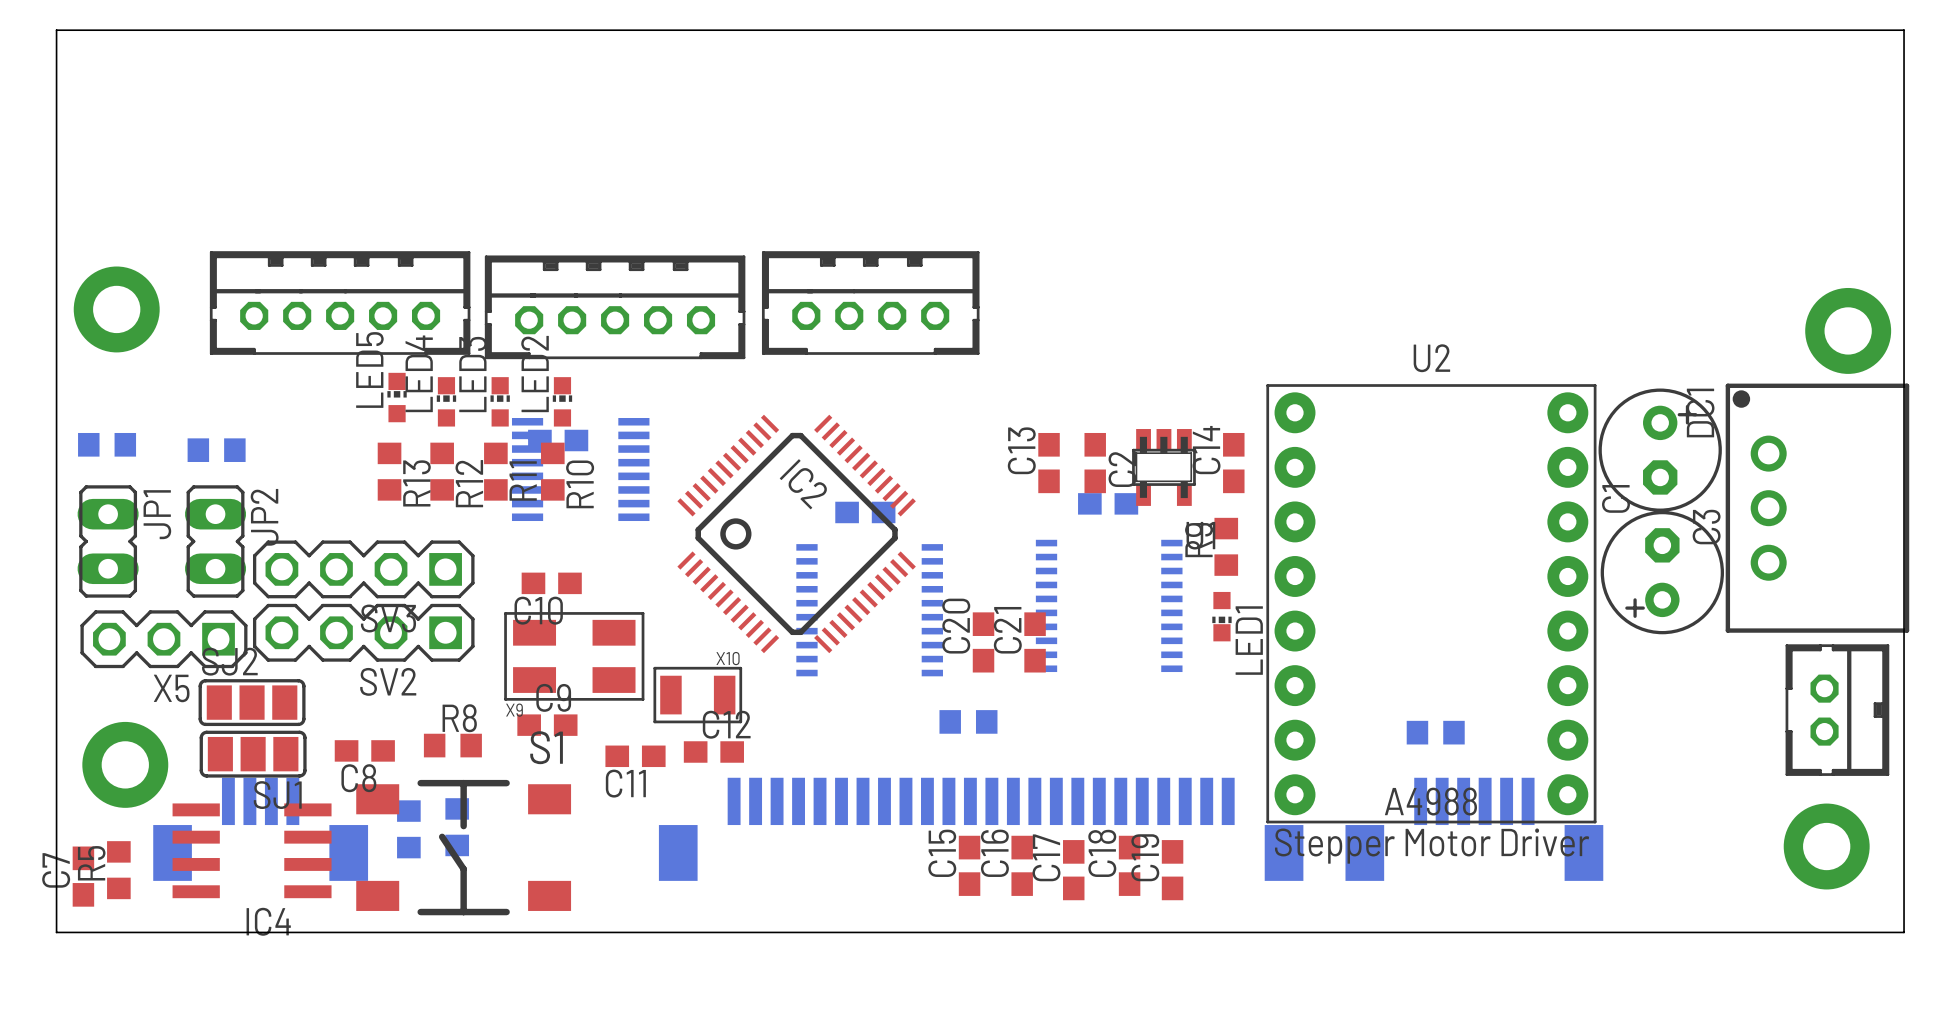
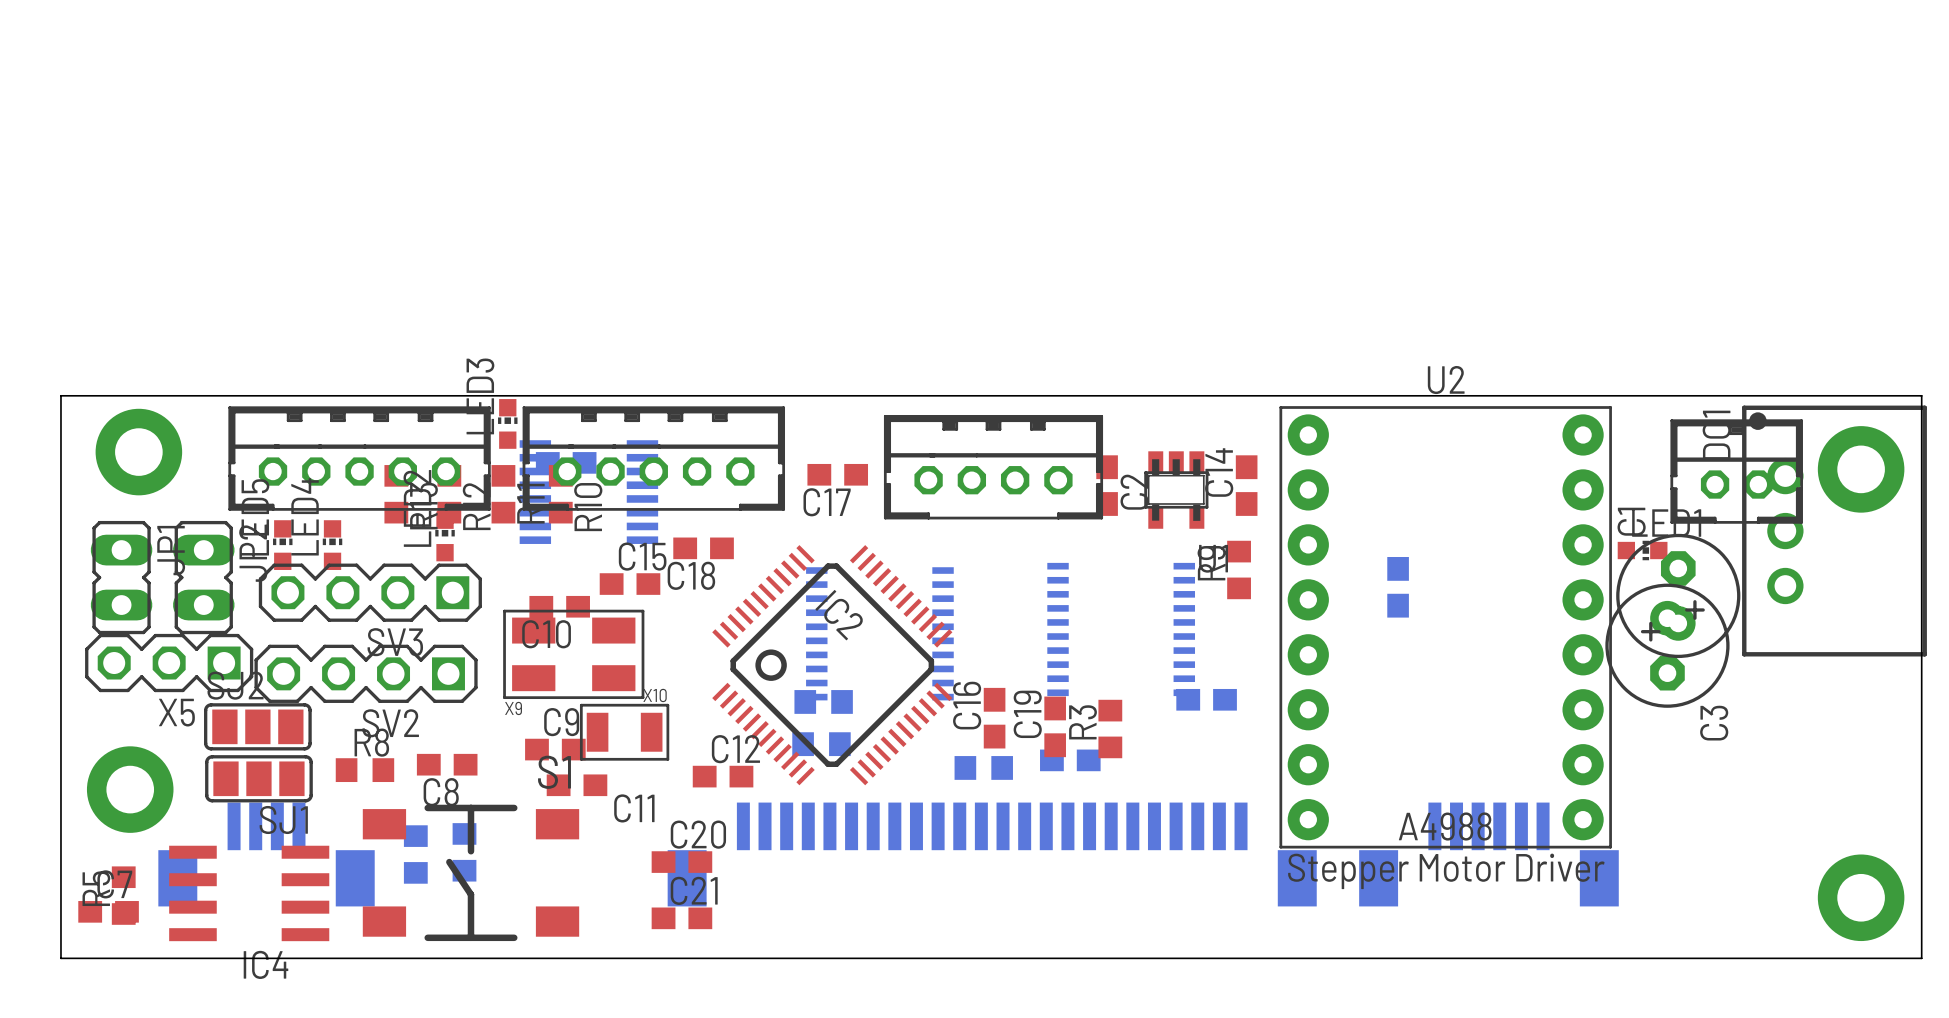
part position: (340, 303) -> (359, 458)
part position: (870, 303) -> (993, 467)
part position: (615, 307) -> (653, 458)
via position: (116, 309) -> (138, 452)
via position: (1848, 330) -> (1861, 469)
board edge: (56, 373) (56, 30) (1904, 30) (1904, 373) -> (60, 395) (1921, 395)
LED5 position: (397, 397) -> (282, 545)
LED4 position: (446, 401) -> (332, 545)
LED2 position: (562, 401) -> (445, 536)
part: (107, 444) -> none
part: (216, 450) -> none
C3 position: (1660, 450) -> (1667, 645)
C13 side: top (1049, 463) -> bottom (1398, 587)
part: (1108, 503) -> none
part: (865, 512) -> none
IC2 position: (796, 533) -> (832, 665)
JP1 position: (108, 541) -> (121, 577)
JP2 position: (215, 541) -> (203, 577)
LED1 rotation: 0° (1221, 616) -> 90° counterclockwise (1642, 550)
LED1 position: (1221, 616) -> (1642, 550)
SV2 position: (363, 632) -> (366, 673)
C20 rotation: 0° (983, 642) -> 90° clockwise (681, 862)
C20 position: (983, 642) -> (681, 862)
C21 rotation: 0° (1035, 642) -> 90° clockwise (681, 918)
C21 position: (1035, 642) -> (681, 918)
X9 position: (574, 656) -> (573, 654)
part: none -> (1206, 699)
part: none -> (823, 701)
X10 position: (697, 695) -> (624, 732)
part rotation: 0° (1837, 710) -> 90° counterclockwise (1736, 471)
part position: (1837, 710) -> (1736, 471)
part: none -> (821, 744)
part position: (968, 721) -> (983, 767)
R3 side: bottom (1435, 732) -> top (1110, 729)
part: none -> (1070, 760)
R8 position: (452, 745) -> (364, 770)
C8 position: (364, 750) -> (447, 764)
C11 position: (635, 756) -> (577, 785)
via position: (1826, 846) -> (1861, 897)
IC4 position: (252, 850) -> (249, 893)
C18 name position: C18 (1102, 853) -> C18 (691, 575)
C17 name position: C17 (1046, 857) -> C17 (827, 502)
C15 rotation: 0° (969, 865) -> 90° clockwise (630, 584)
C15 position: (969, 865) -> (630, 584)
C16 position: (1022, 865) -> (994, 718)
C18 rotation: 0° (1129, 865) -> 90° clockwise (703, 548)
C18 position: (1129, 865) -> (703, 548)
C17 rotation: 0° (1073, 870) -> 90° clockwise (837, 474)
C17 position: (1073, 870) -> (837, 474)
C19 position: (1172, 870) -> (1055, 726)
C7 rotation: 0° (83, 876) -> 90° clockwise (108, 911)

